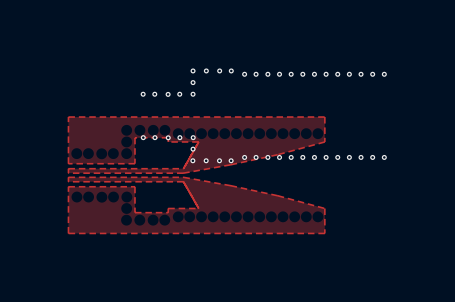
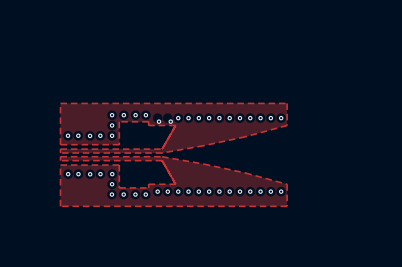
via: (193, 70) -> none
via: (206, 70) -> none
via: (219, 70) -> none
via: (231, 70) -> none
via: (244, 74) -> none
via: (256, 74) -> none
via: (267, 74) -> none
via: (279, 74) -> none
via: (291, 74) -> none
via: (302, 74) -> none
via: (314, 74) -> none
via: (326, 74) -> none
via: (337, 74) -> none
via: (349, 74) -> none
via: (361, 74) -> none
via: (372, 74) -> none
via: (384, 74) -> none
via: (193, 82) -> none
via: (143, 94) -> none
via: (154, 94) -> none
via: (168, 94) -> none
via: (179, 94) -> none
via: (193, 94) -> none
via: none -> (112, 115)
via: none -> (123, 115)
via: none -> (135, 115)
via: none -> (145, 115)
via: none -> (178, 118)
via: none -> (188, 118)
via: none -> (198, 118)
via: none -> (209, 118)
via: none -> (219, 118)
via: none -> (229, 118)
via: none -> (239, 118)
via: none -> (250, 118)
via: none -> (260, 118)
via: none -> (270, 118)
via: none -> (281, 118)
via: (143, 137) -> none
via: (154, 137) -> none
via: (168, 137) -> none
via: none -> (112, 125)
via: (193, 149) -> none
via: none -> (68, 135)
via: none -> (78, 135)
via: none -> (90, 135)
via: none -> (100, 135)
via: none -> (112, 135)
via: (244, 157) -> none
via: (256, 157) -> none
via: (267, 157) -> none
via: (279, 157) -> none
via: (291, 157) -> none
via: (302, 157) -> none
via: (314, 157) -> none
via: (326, 157) -> none
via: (337, 157) -> none
via: (349, 157) -> none
via: (361, 157) -> none
via: (372, 157) -> none
via: (384, 157) -> none
via: (192, 160) -> none
via: (206, 160) -> none
via: (219, 160) -> none
via: (231, 160) -> none
via: none -> (68, 174)
via: none -> (78, 174)
via: none -> (90, 174)
via: none -> (100, 174)
via: none -> (112, 174)
via: none -> (112, 184)
via: none -> (157, 191)
via: none -> (167, 191)
via: none -> (178, 191)
via: none -> (188, 191)
via: none -> (198, 191)
via: none -> (209, 191)
via: none -> (219, 191)
via: none -> (229, 191)
via: none -> (239, 191)
via: none -> (250, 191)
via: none -> (260, 191)
via: none -> (270, 191)
via: none -> (281, 191)
via: none -> (111, 194)
via: none -> (123, 194)
via: none -> (135, 194)
via: none -> (145, 194)

